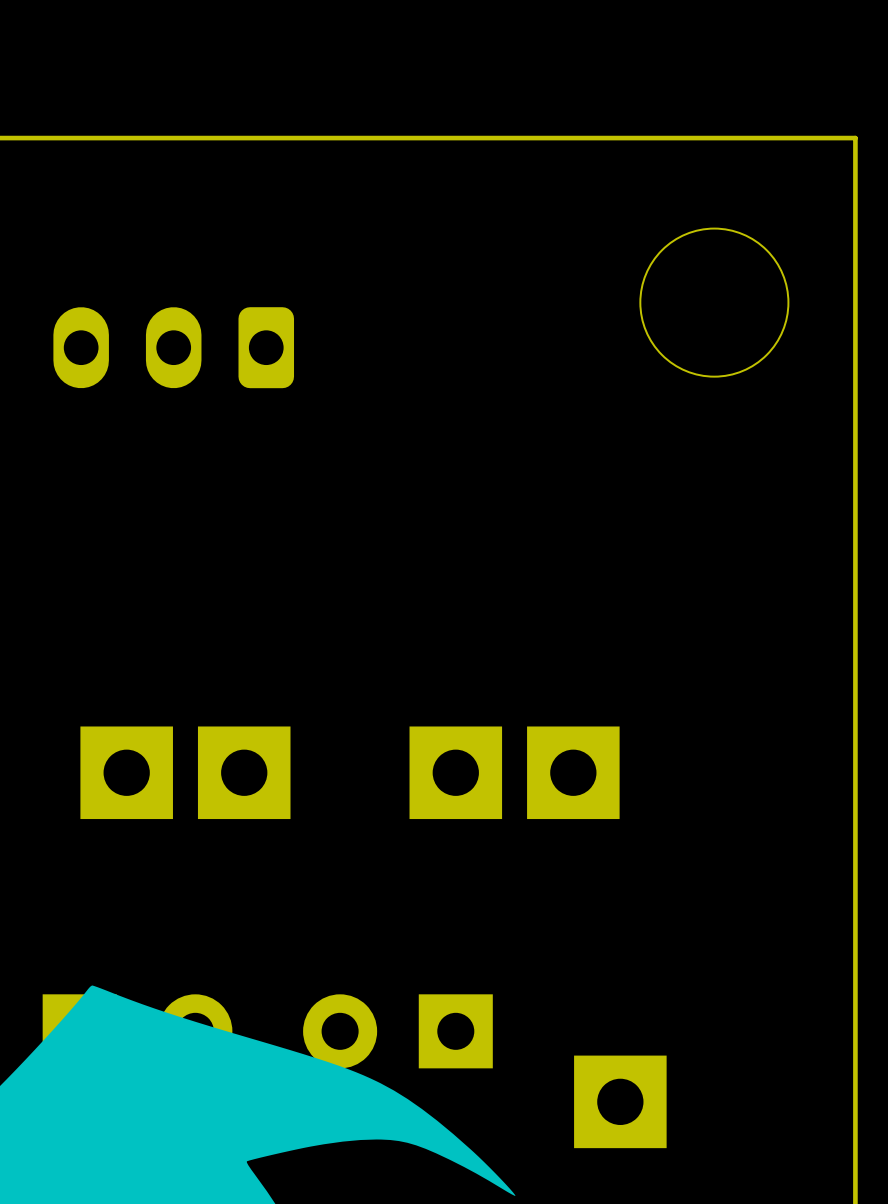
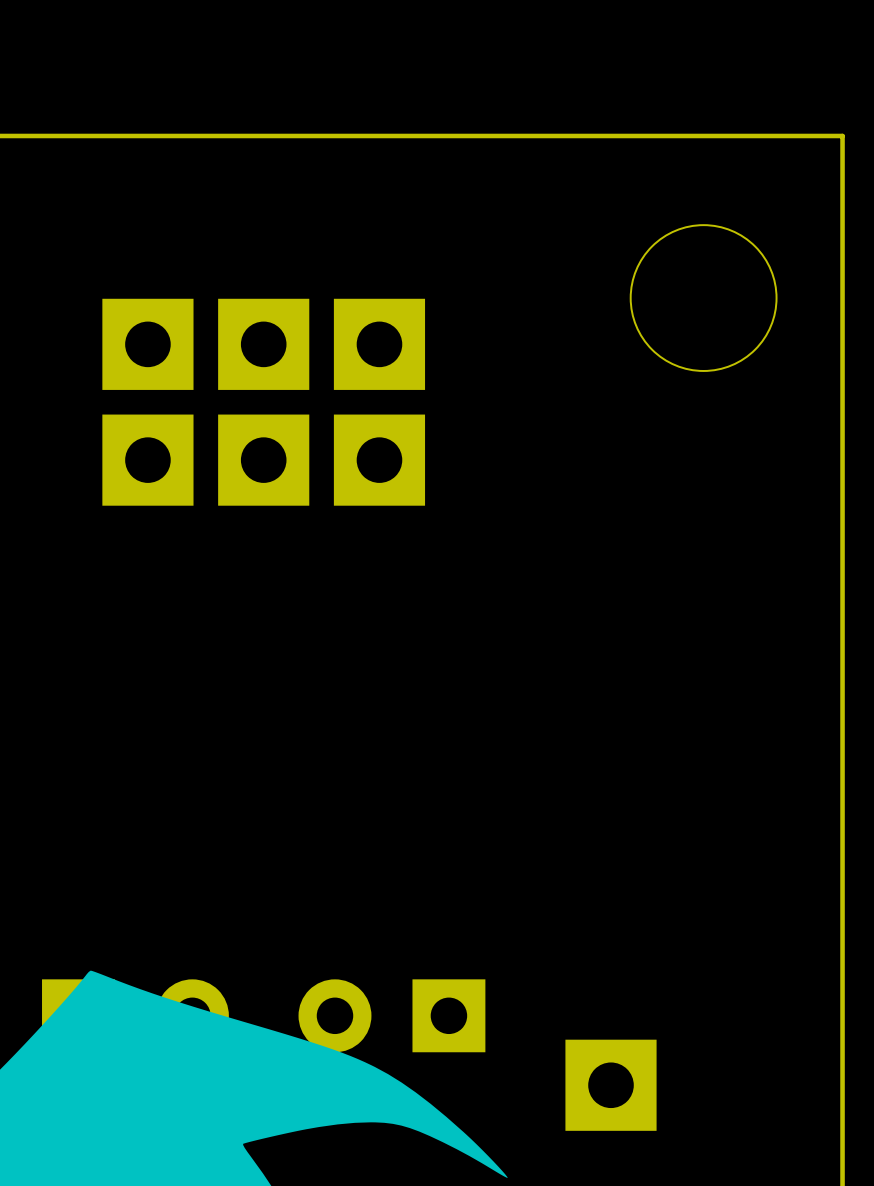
part footprint: [53, 307, 295, 389] -> [102, 298, 194, 390]
part: none -> (263, 344)
part: none -> (379, 344)
part: none -> (147, 460)
part: none -> (263, 460)
part: none -> (379, 460)
part: (126, 772) -> none
part: (244, 772) -> none
part: (455, 772) -> none
part: (573, 772) -> none

